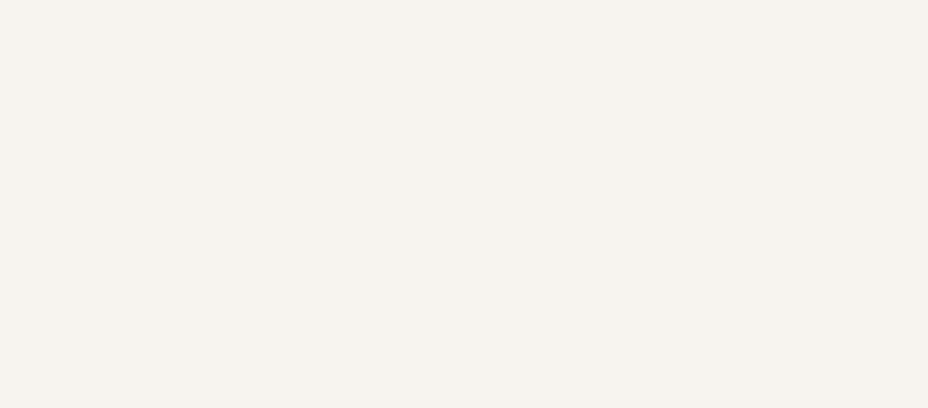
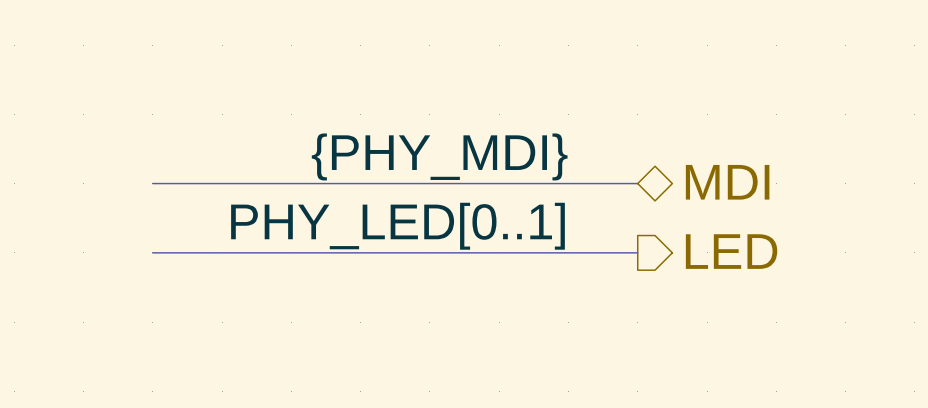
label: none -> {PHY_MDI} (439, 156)
hierarchical label: none -> MDI (727, 182)
bus: none -> (152, 183) (637, 183)
label: none -> PHY_LED[0..1] (397, 226)
hierarchical label: none -> LED (731, 251)
bus: none -> (152, 252) (637, 252)

